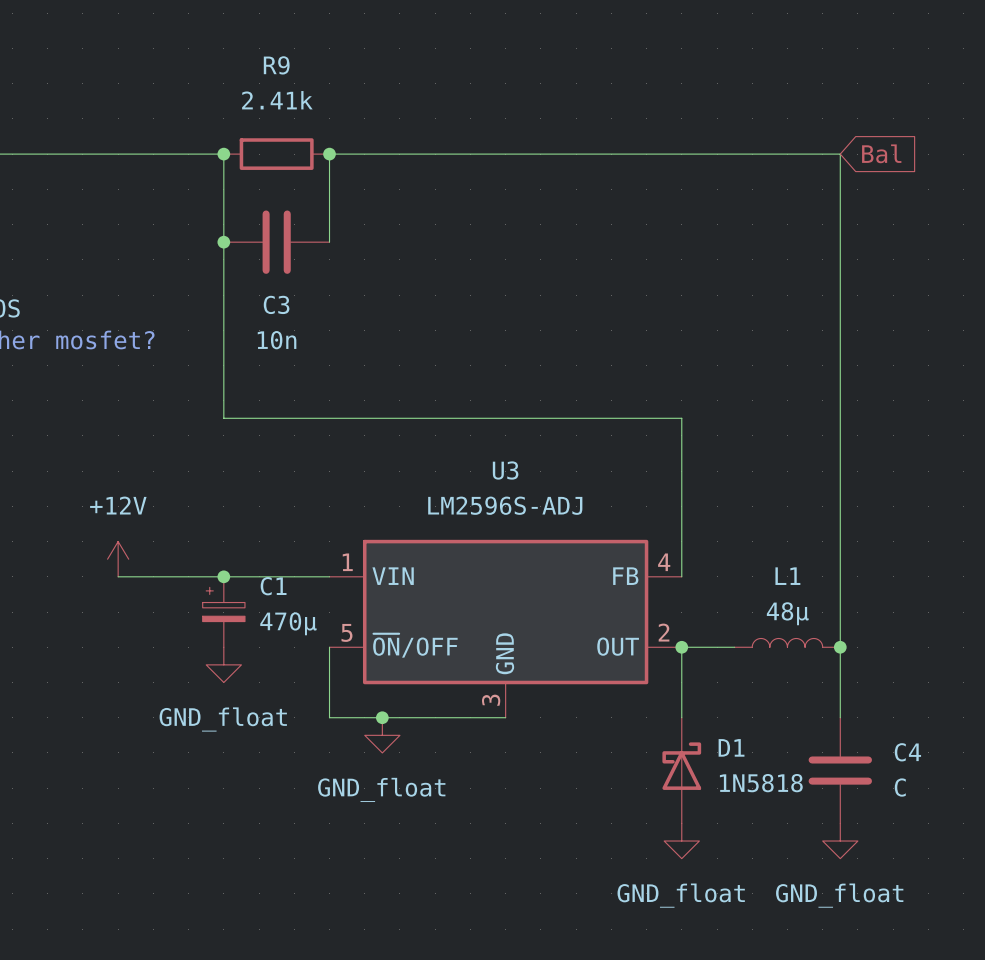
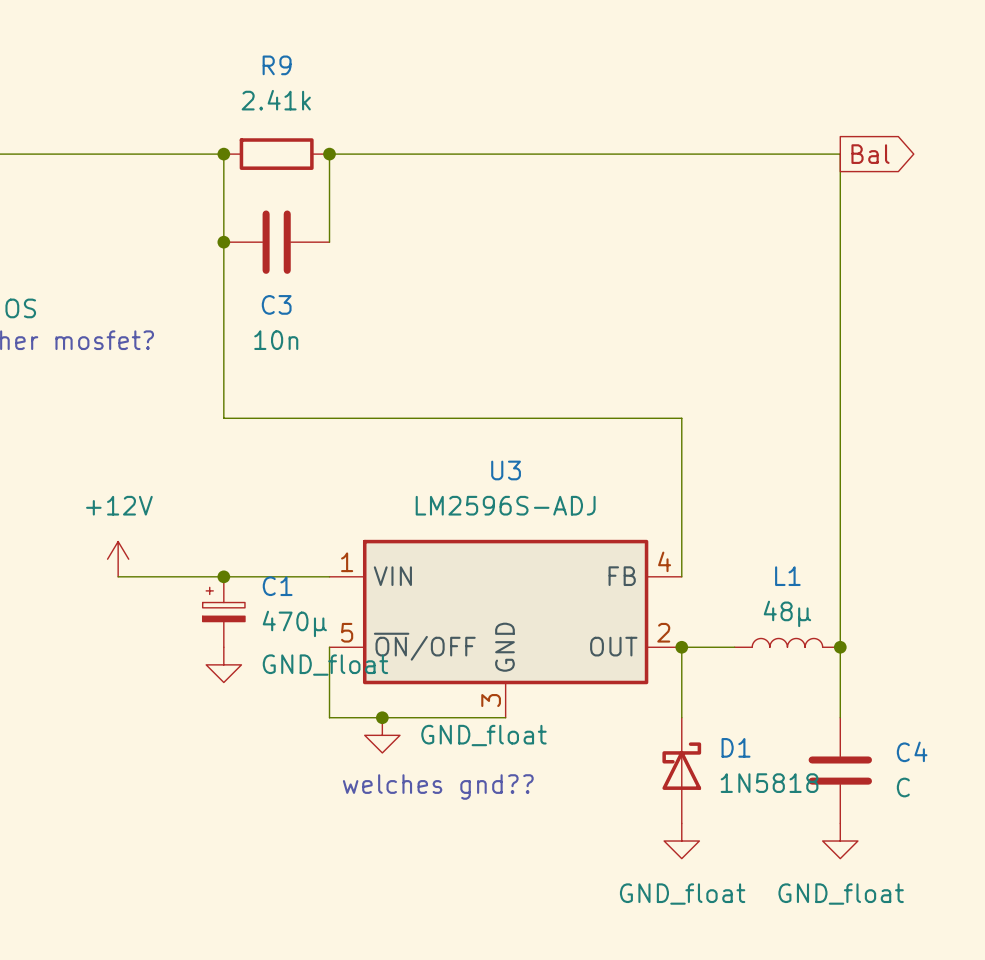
global label shape: input (881, 153) -> output (870, 154)
power symbol text position: GND_float (223, 719) -> GND_float (325, 665)
text: none -> welches gnd?? (438, 786)
power symbol text position: GND_float (381, 789) -> GND_float (483, 735)

